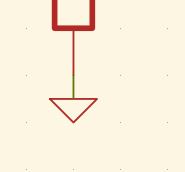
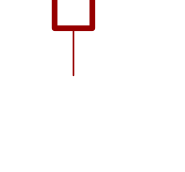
wire: (73, 75) (73, 98) -> none
power symbol: (73, 110) -> none

